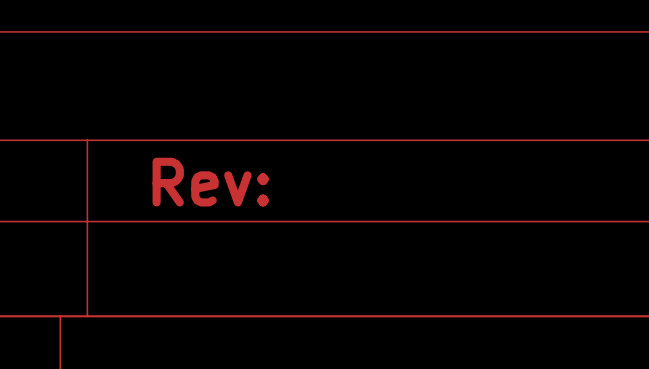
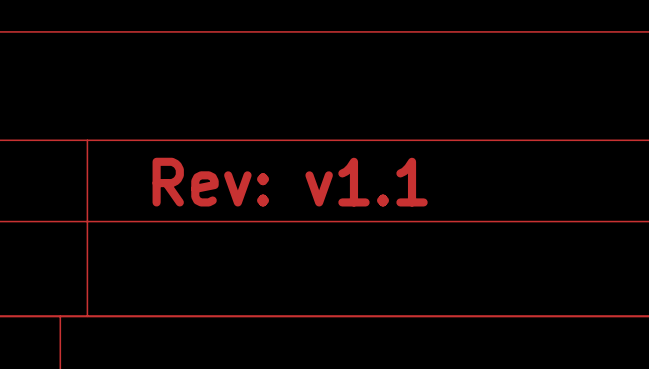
title block: Rev: (210, 182) -> Rev: v1.1 (290, 182)

